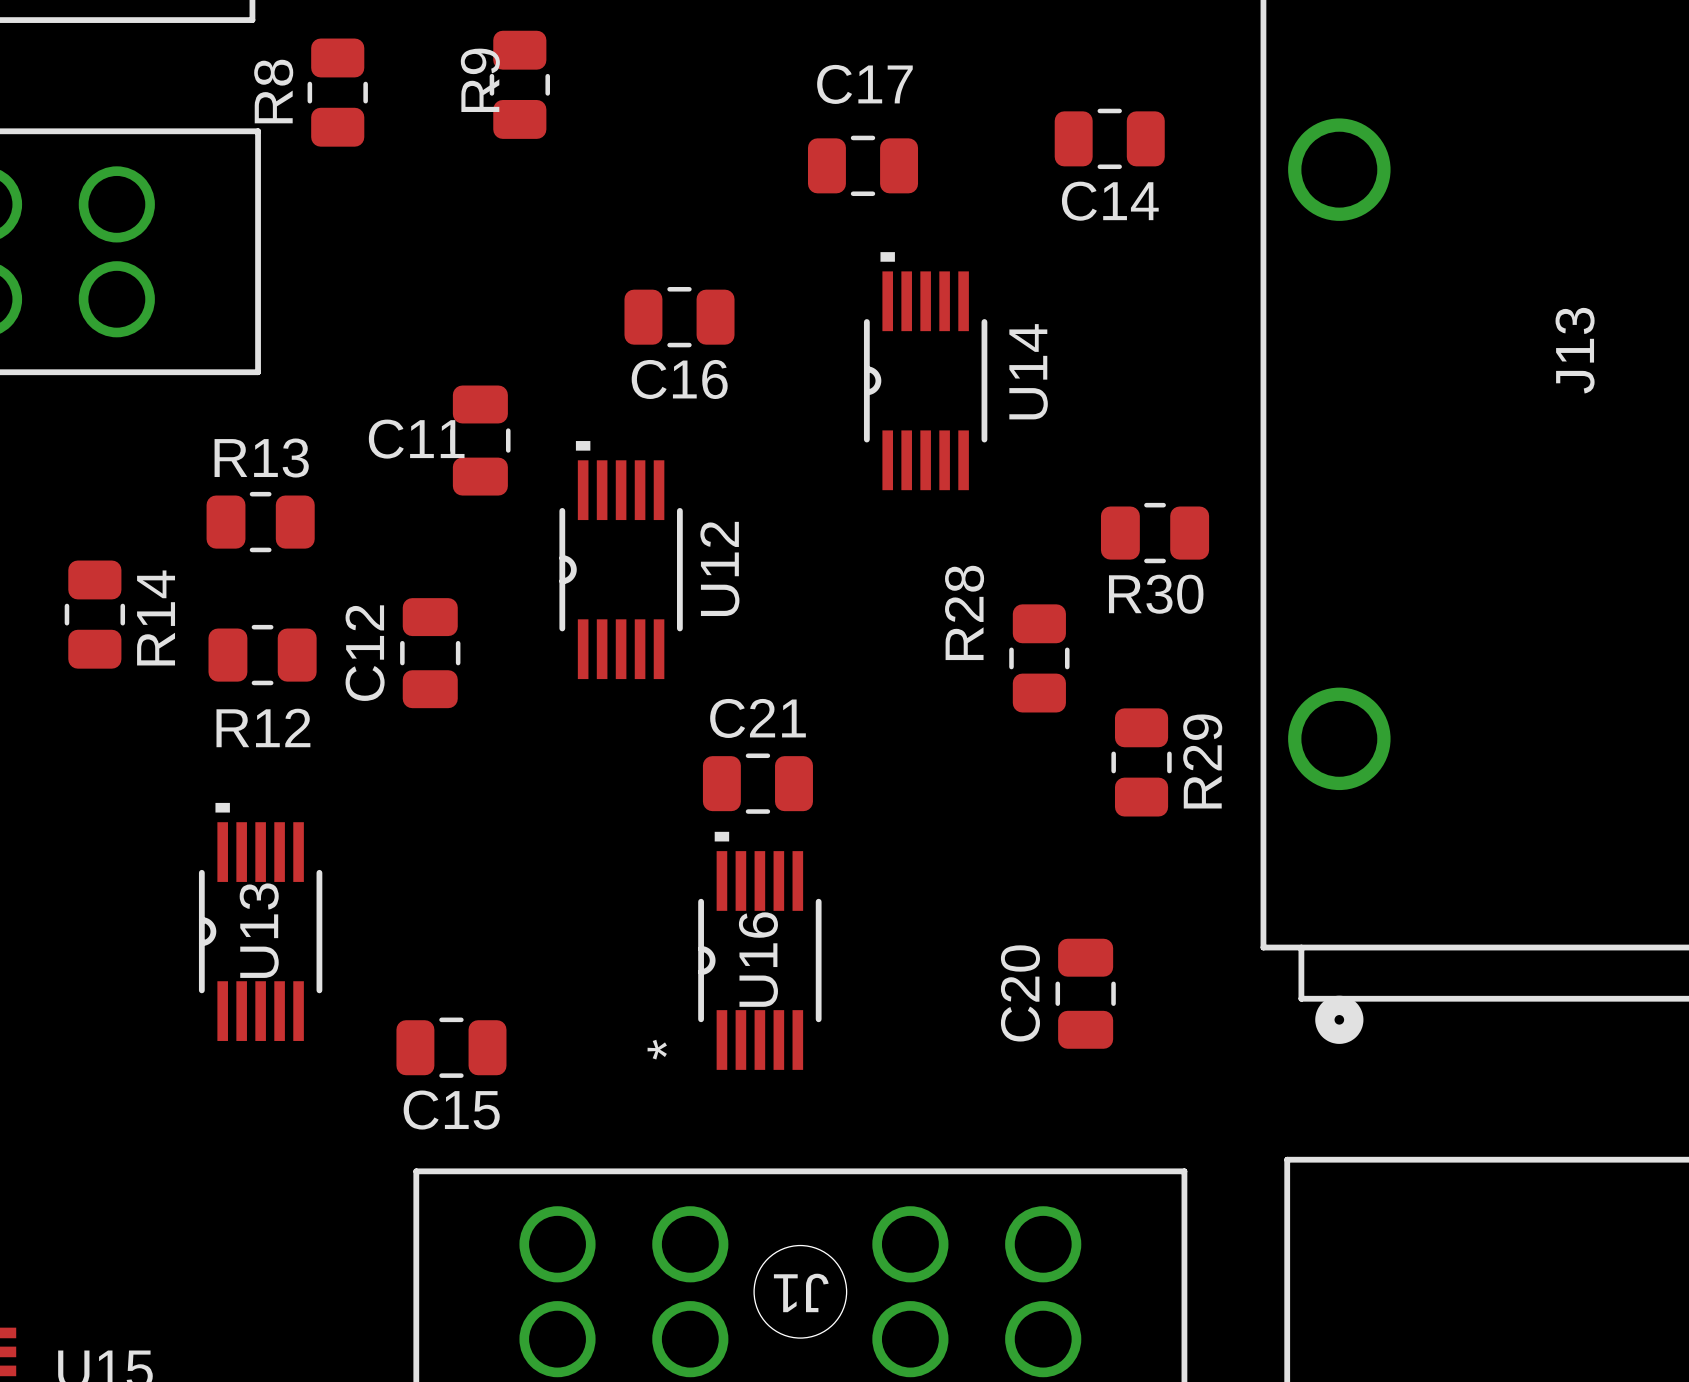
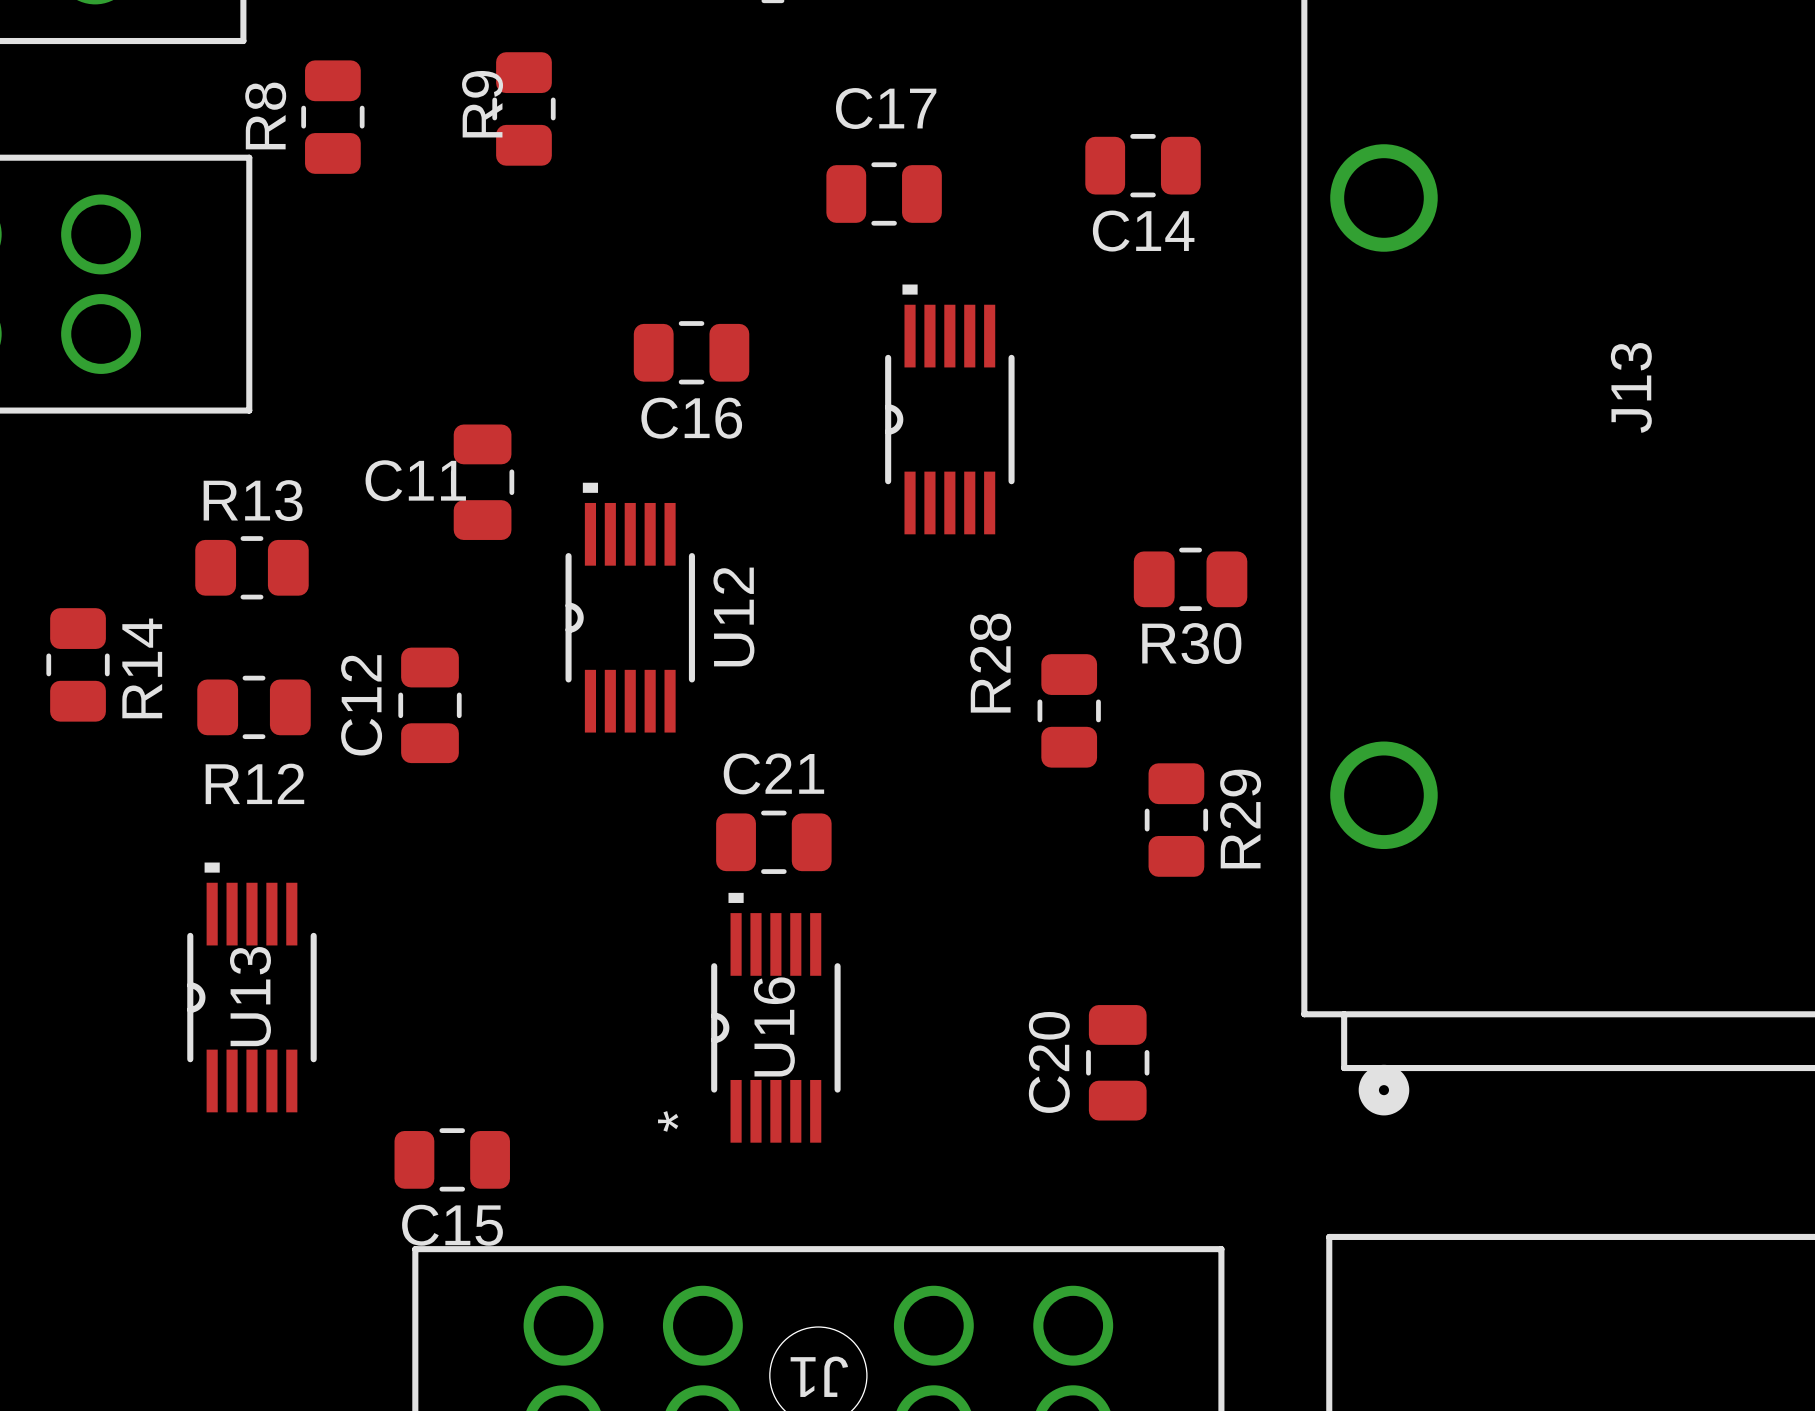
U14 name: U14 (1028, 371) -> none
C15 position: (451, 1047) -> (452, 1159)

